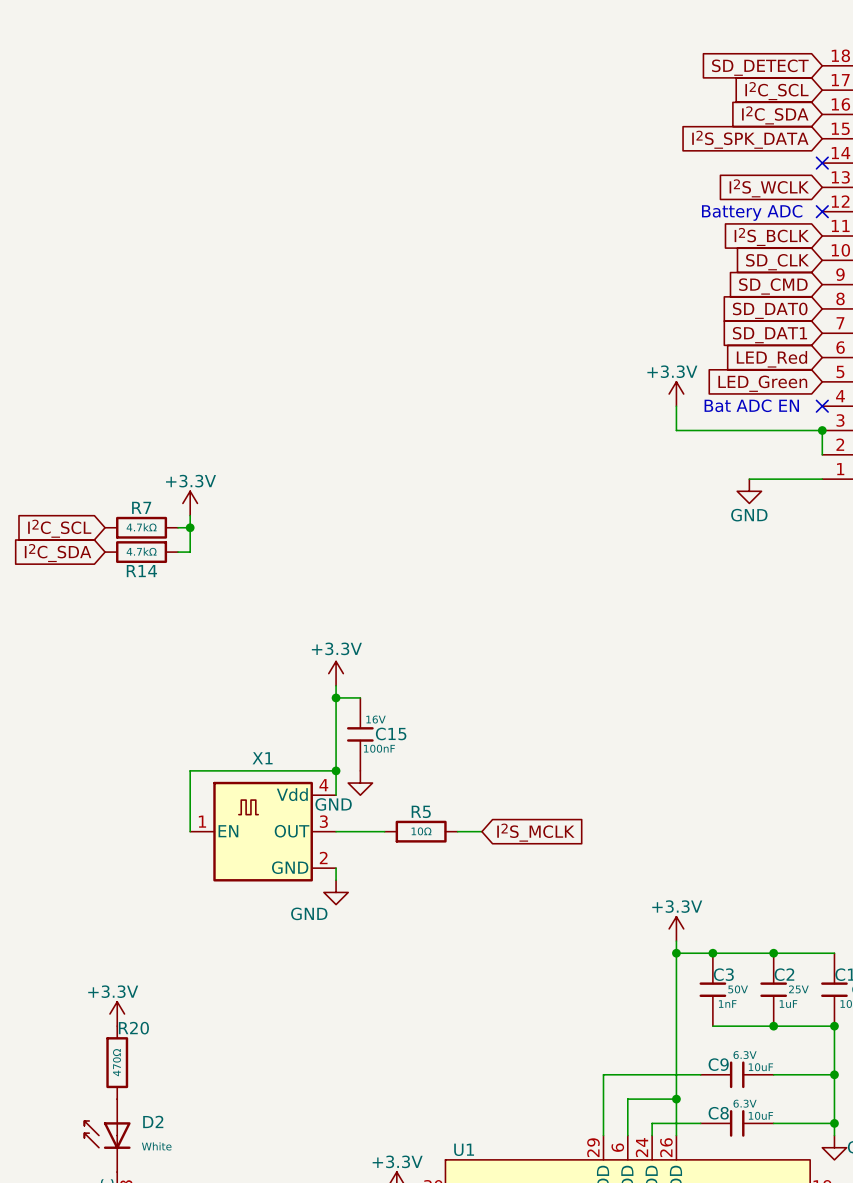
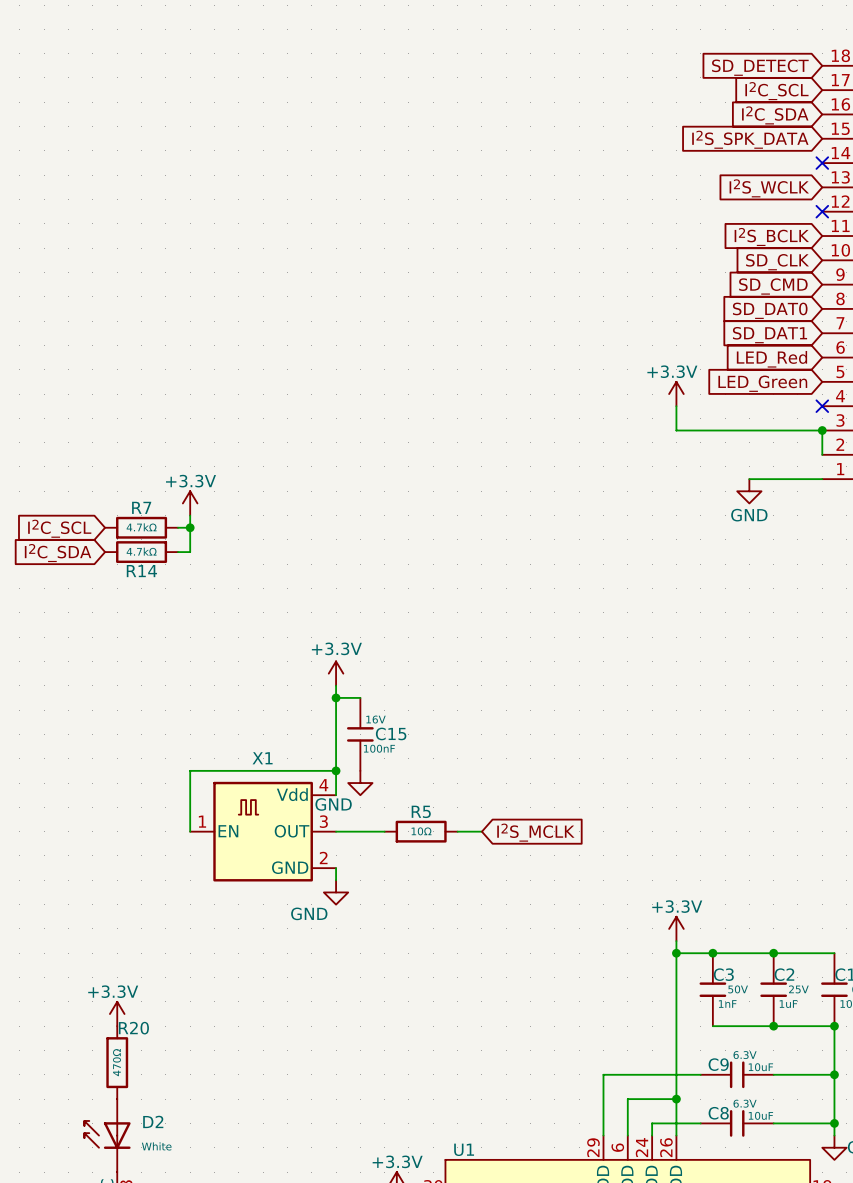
text: Battery ADC (752, 212) -> none
text: Bat ADC EN (751, 405) -> none

